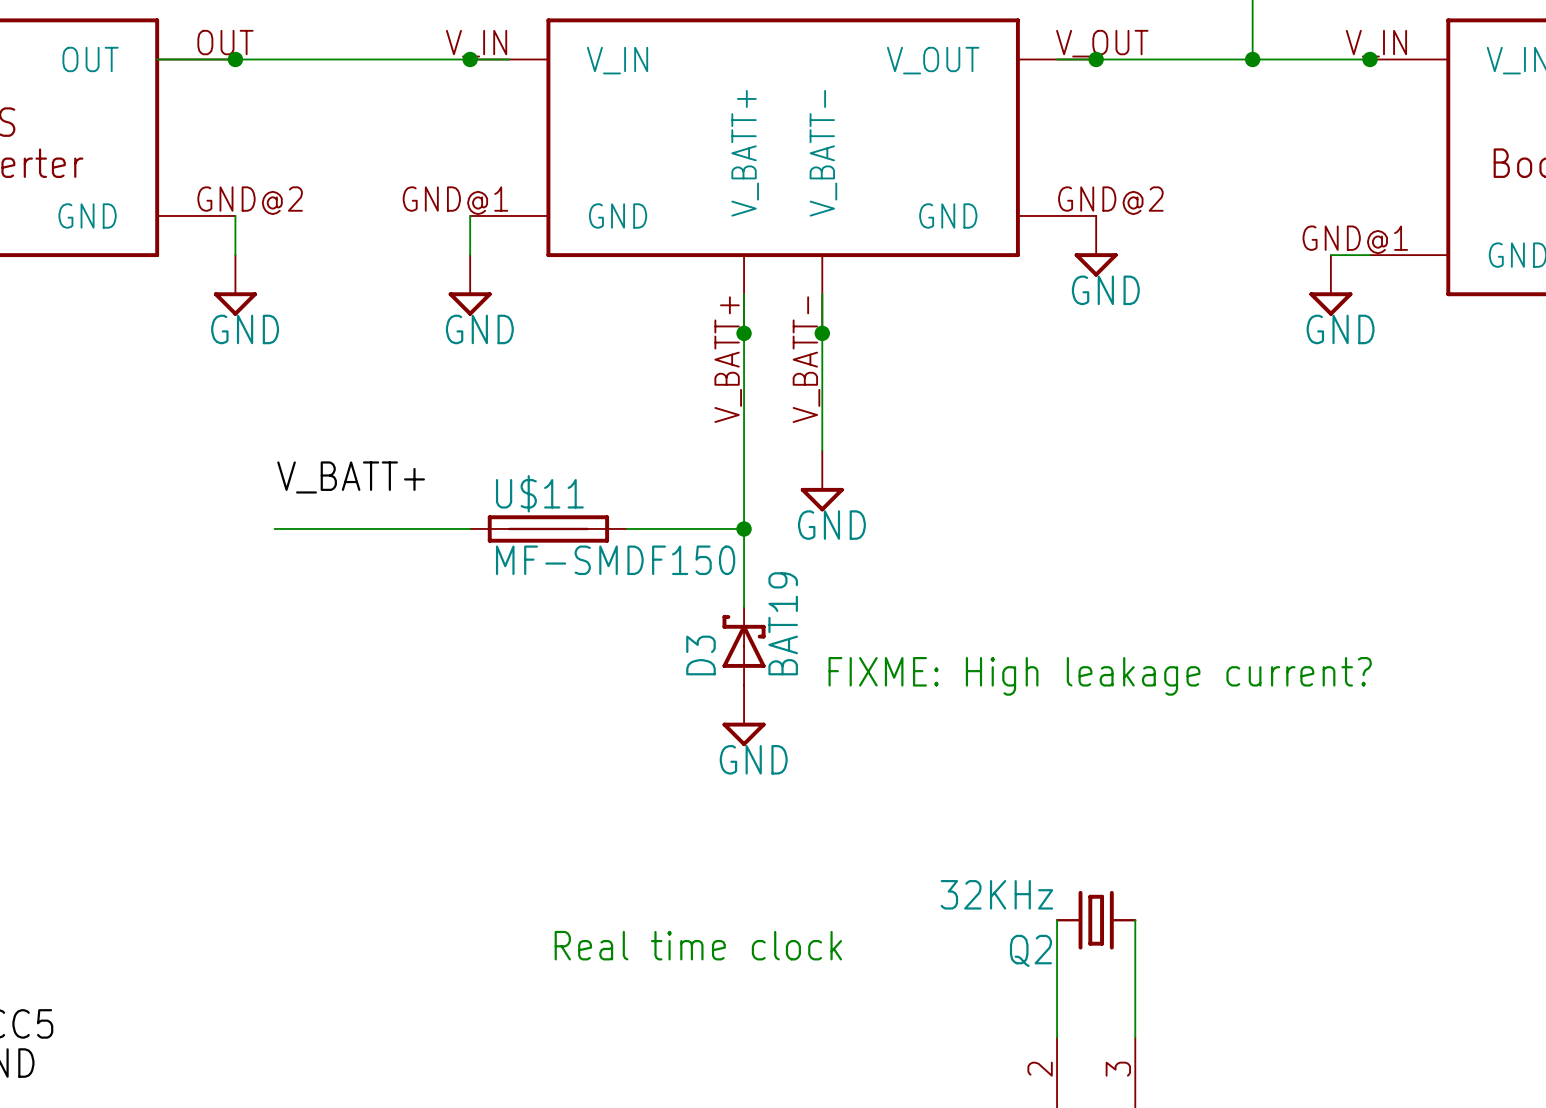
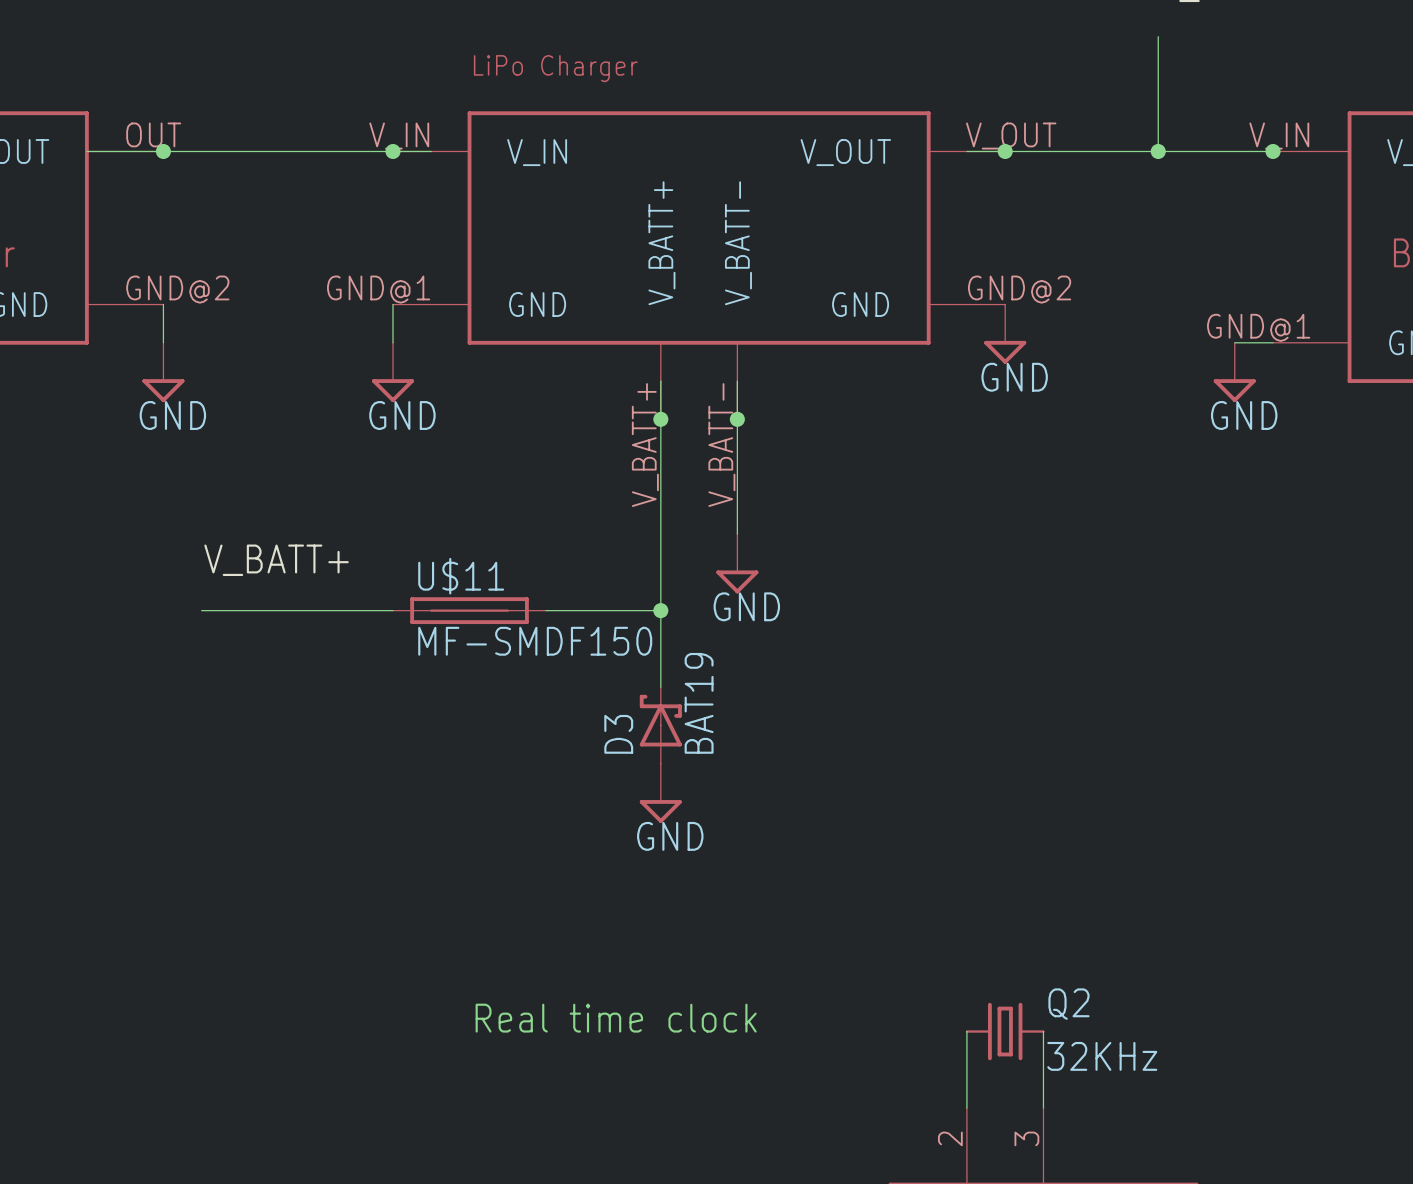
text: FIXME: High leakage current? (1100, 676) -> none
Q2 value position: 32KHz (996, 894) -> 32KHz (1102, 1056)
wire: (1057, 920) (1057, 959) -> none
Q2 position: (1096, 920) -> (1005, 1031)
wire: (1135, 920) (1135, 959) -> none
Q2 name position: Q2 (1030, 950) -> Q2 (1068, 1004)

